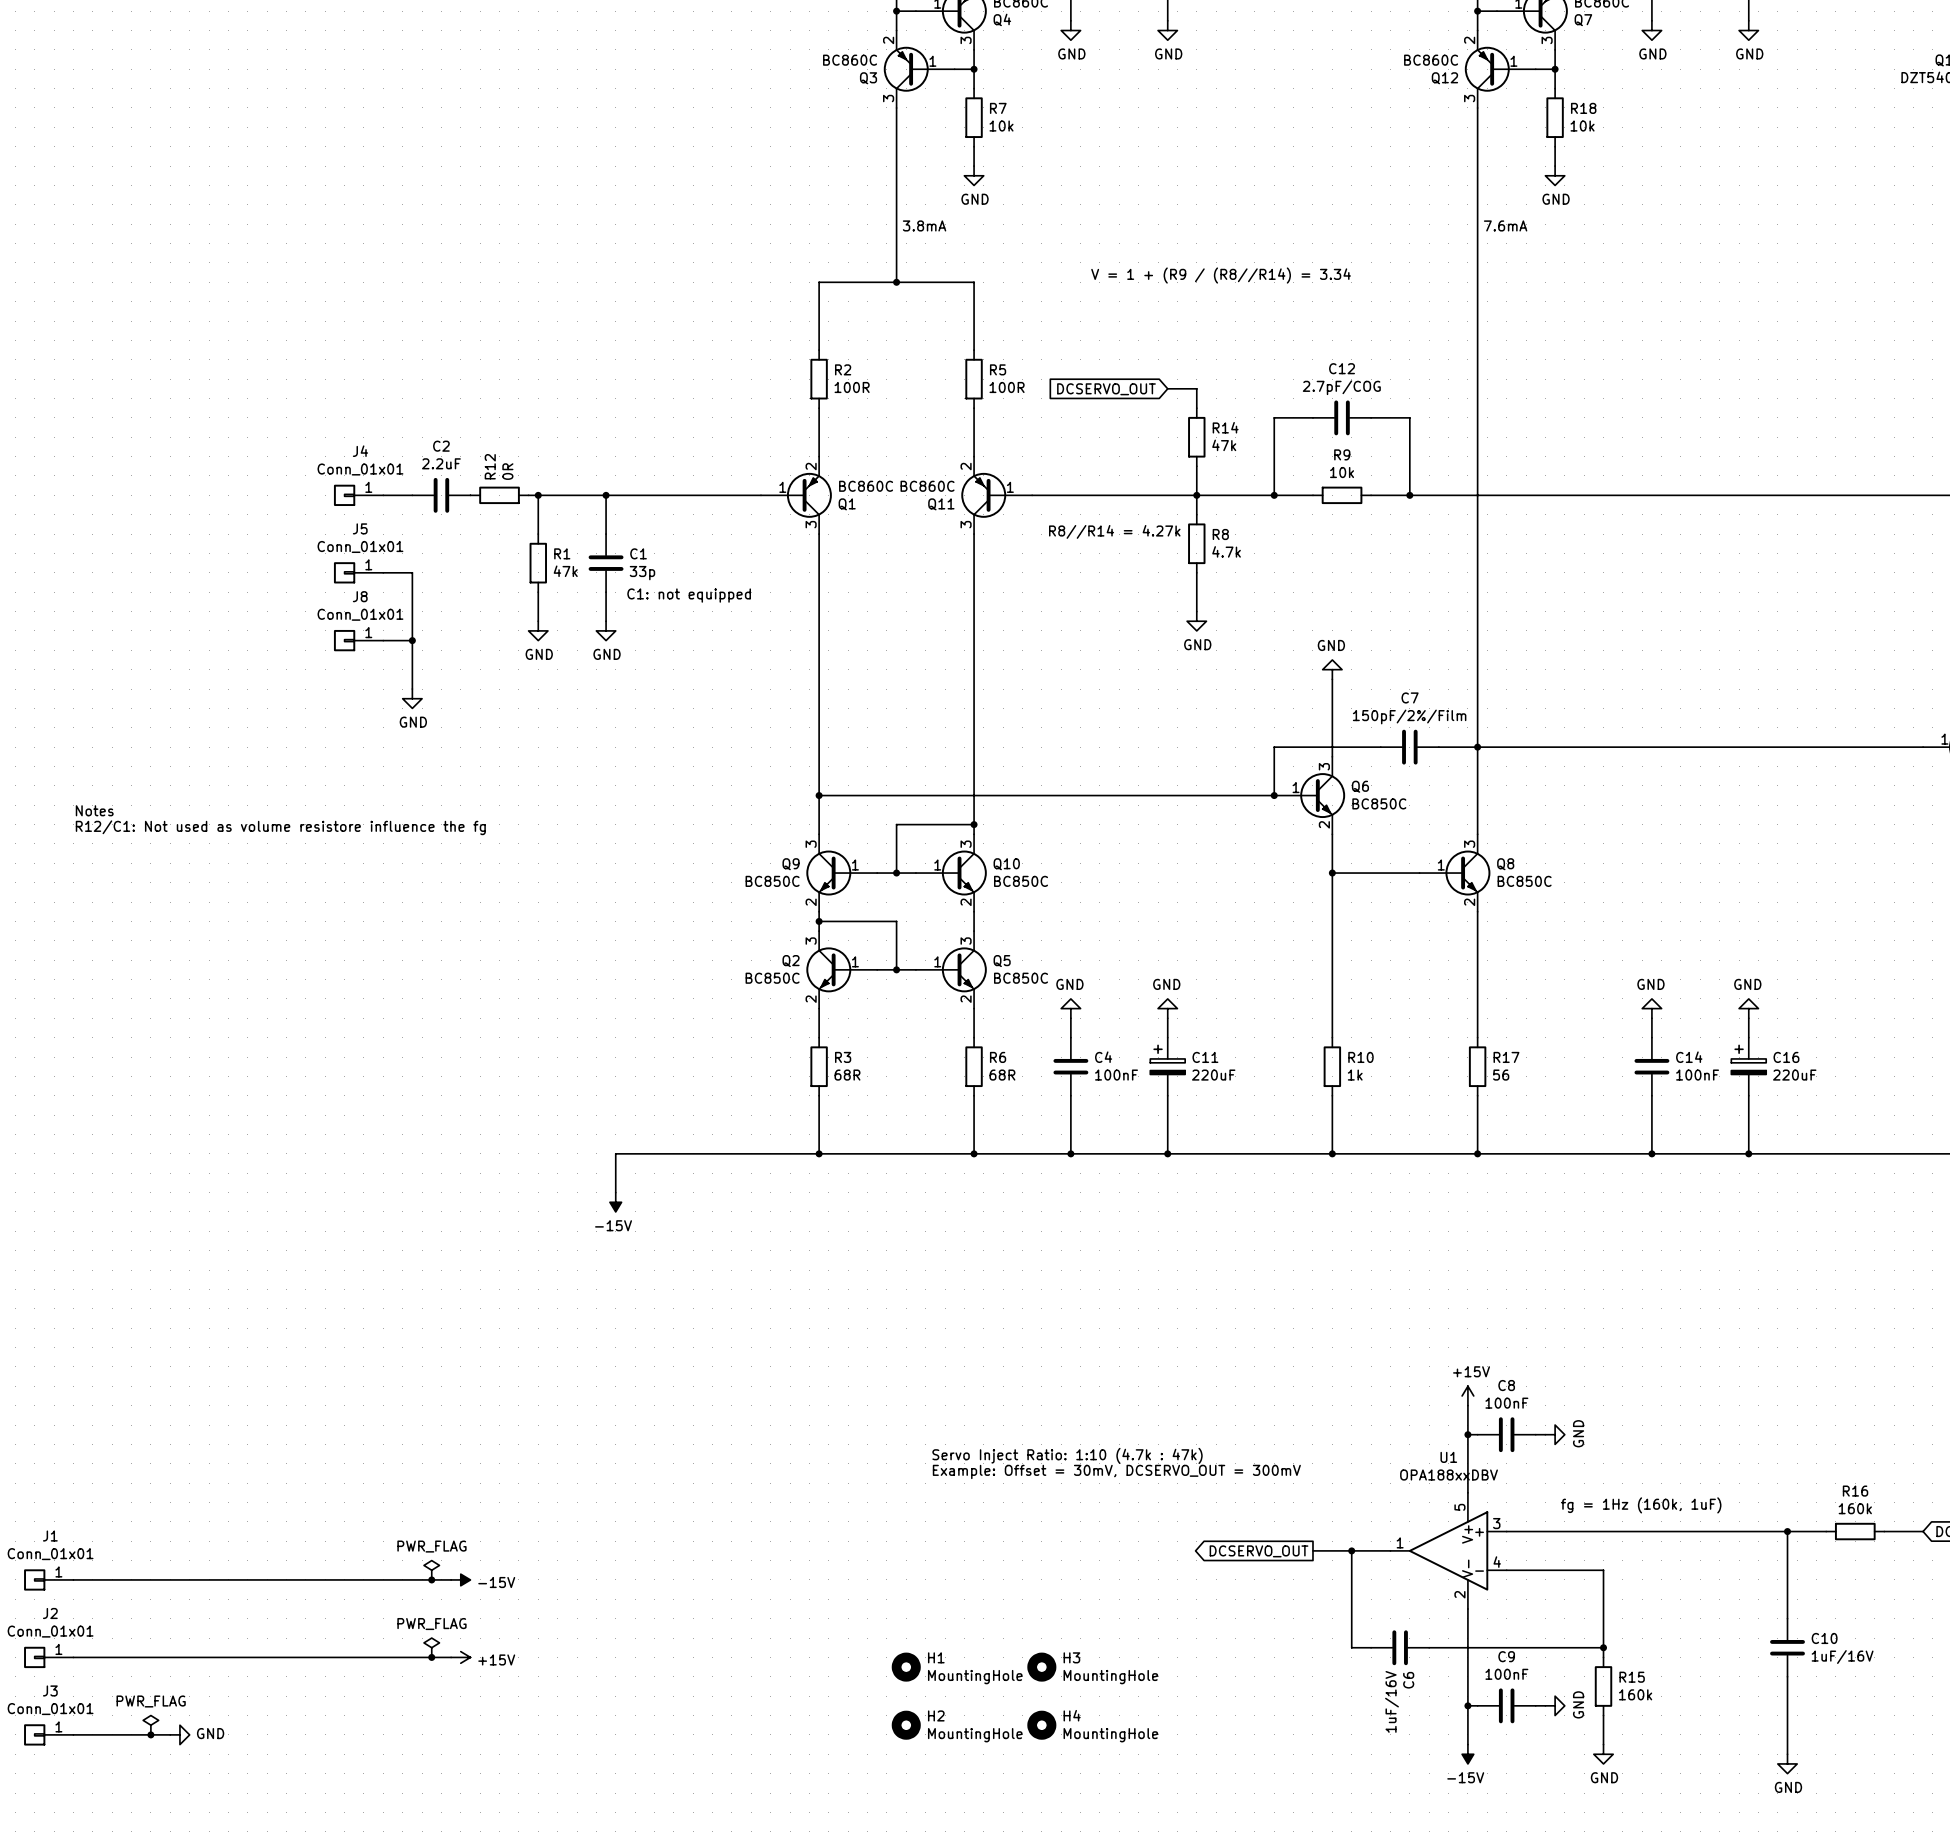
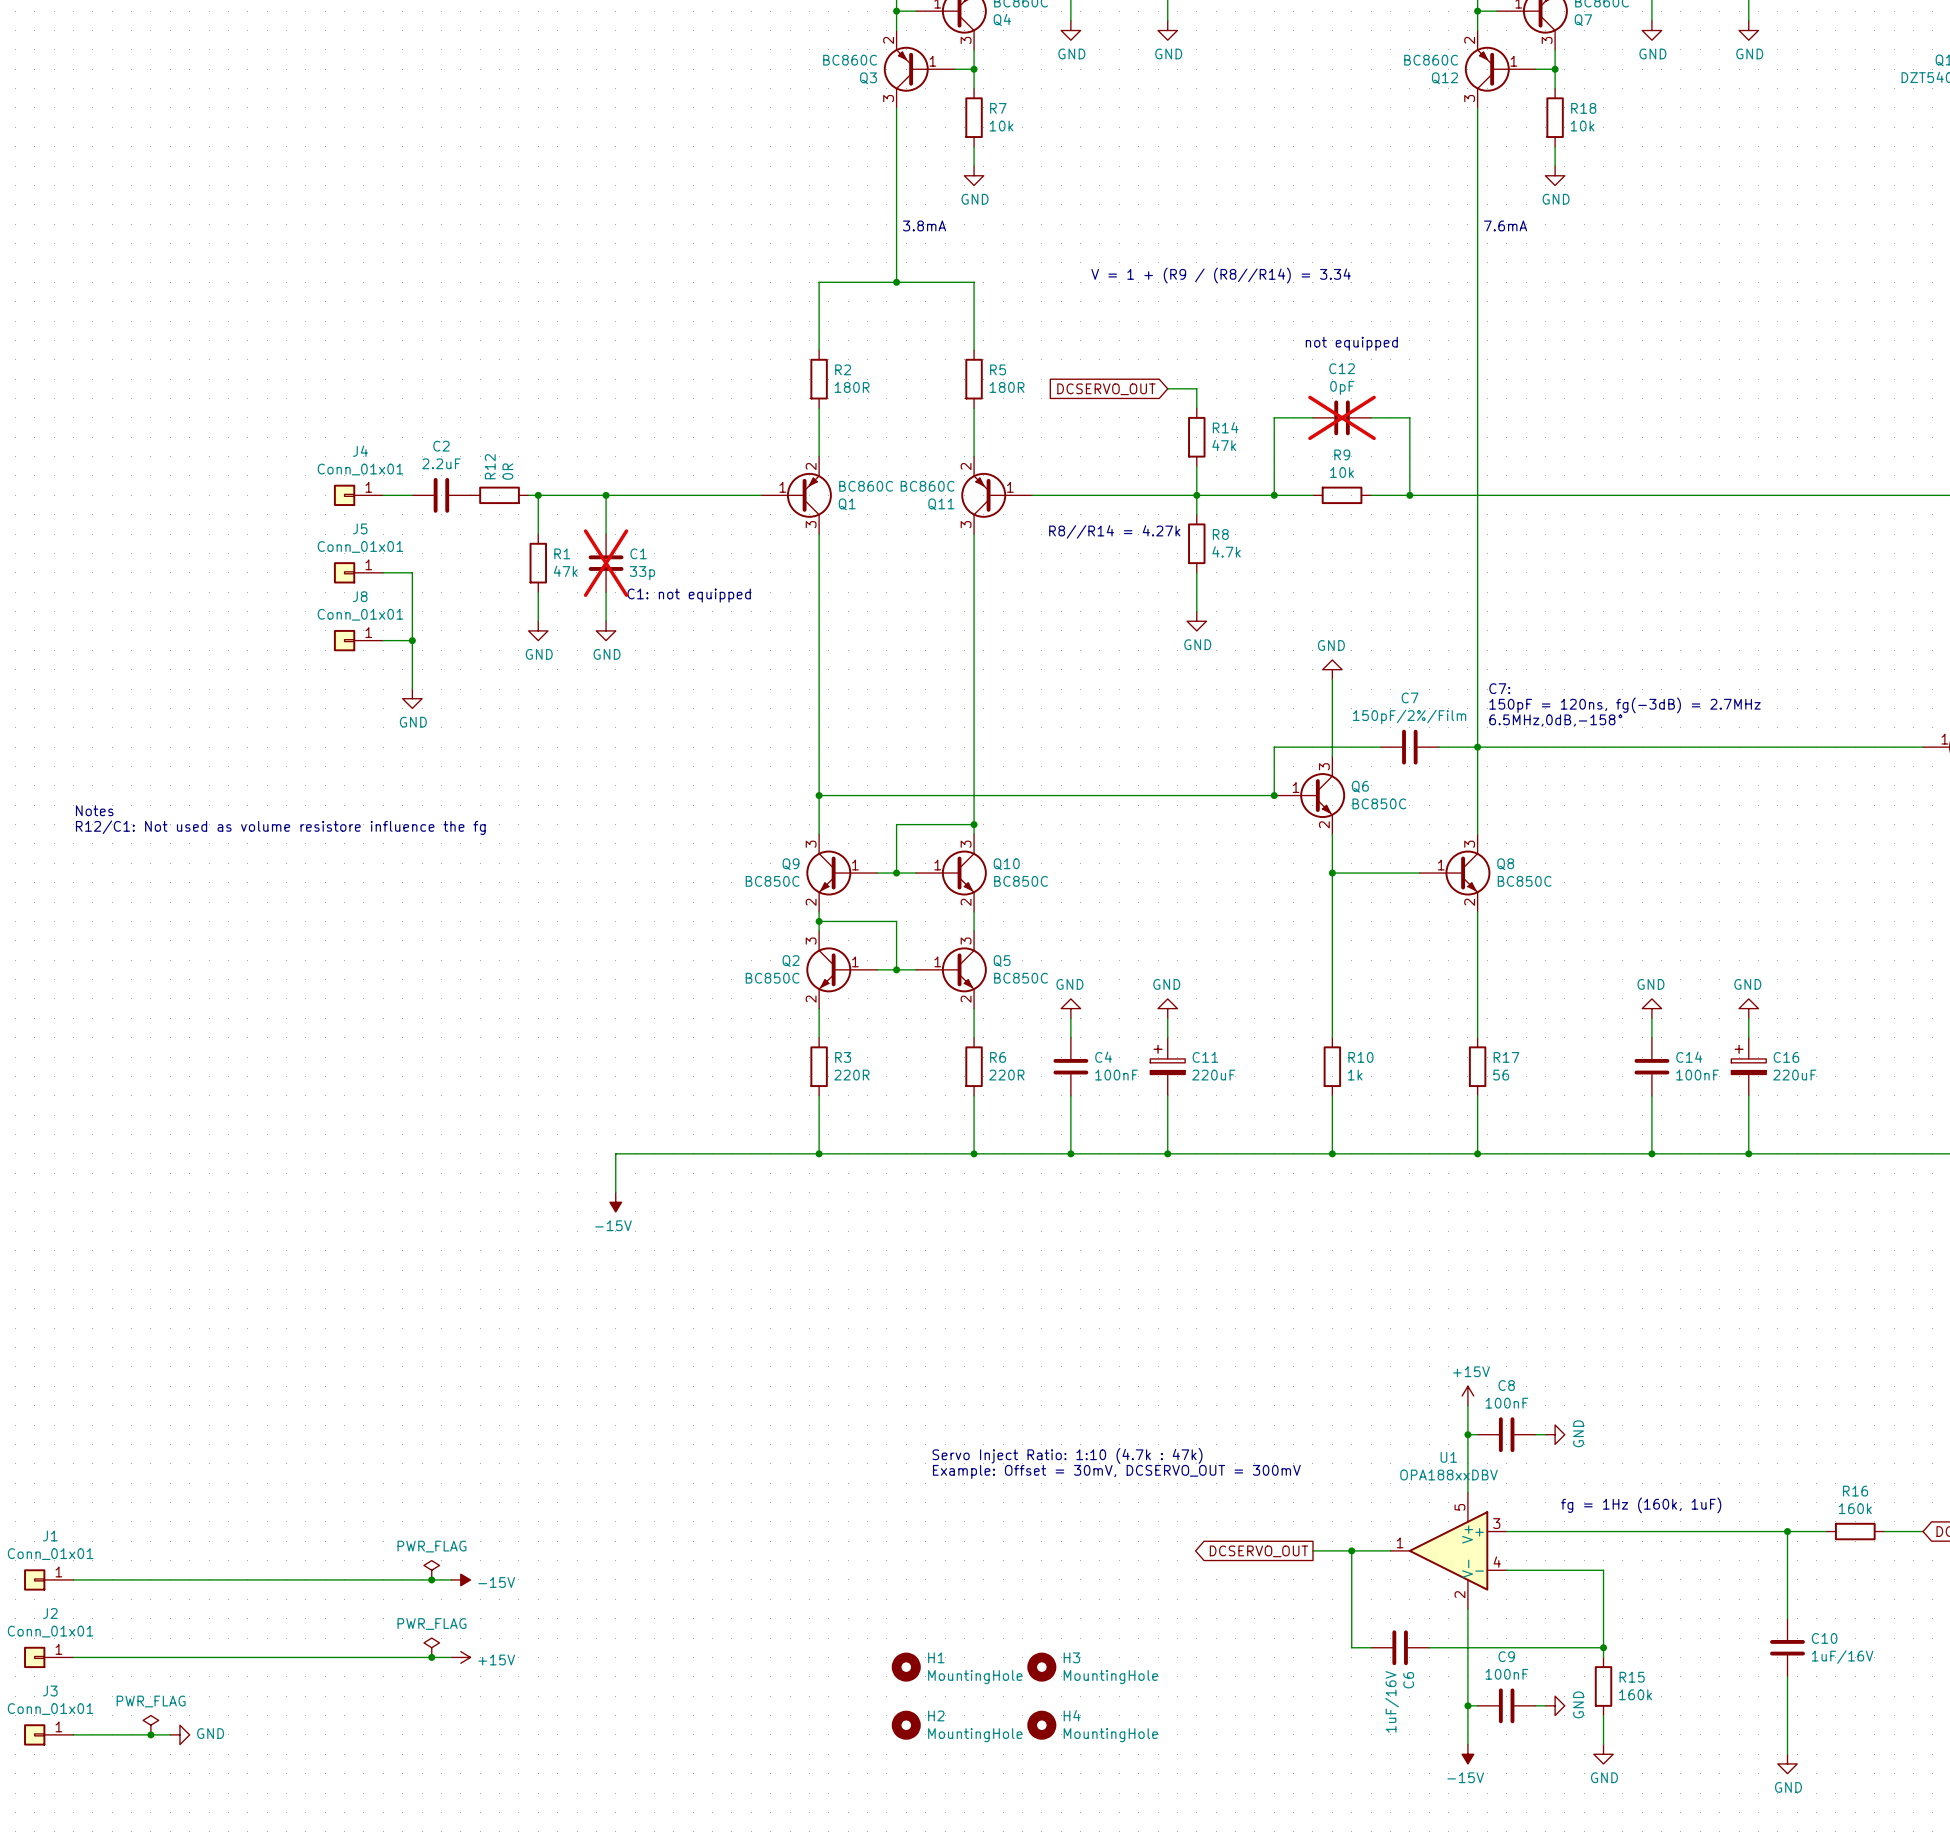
text: none -> not equipped (1351, 343)
R2 value: 100R (852, 387) -> 180R (852, 387)
R5 value: 100R (1007, 387) -> 180R (1007, 387)
C12 value: 2.7pF/COG (1341, 387) -> 0pF (1342, 387)
C12 do-not-place cross: none -> (1342, 417)
C1 do-not-place cross: none -> (606, 563)
text: none -> C7: (1499, 688)
text: none -> 150pF = 120ns, fg(-3dB) = 2.7MHz (1625, 705)
text: none -> 6.5MHz,0dB,-158° (1555, 720)
R3 value: 68R (847, 1075) -> 220R (851, 1075)
R6 value: 68R (1002, 1075) -> 220R (1006, 1075)

